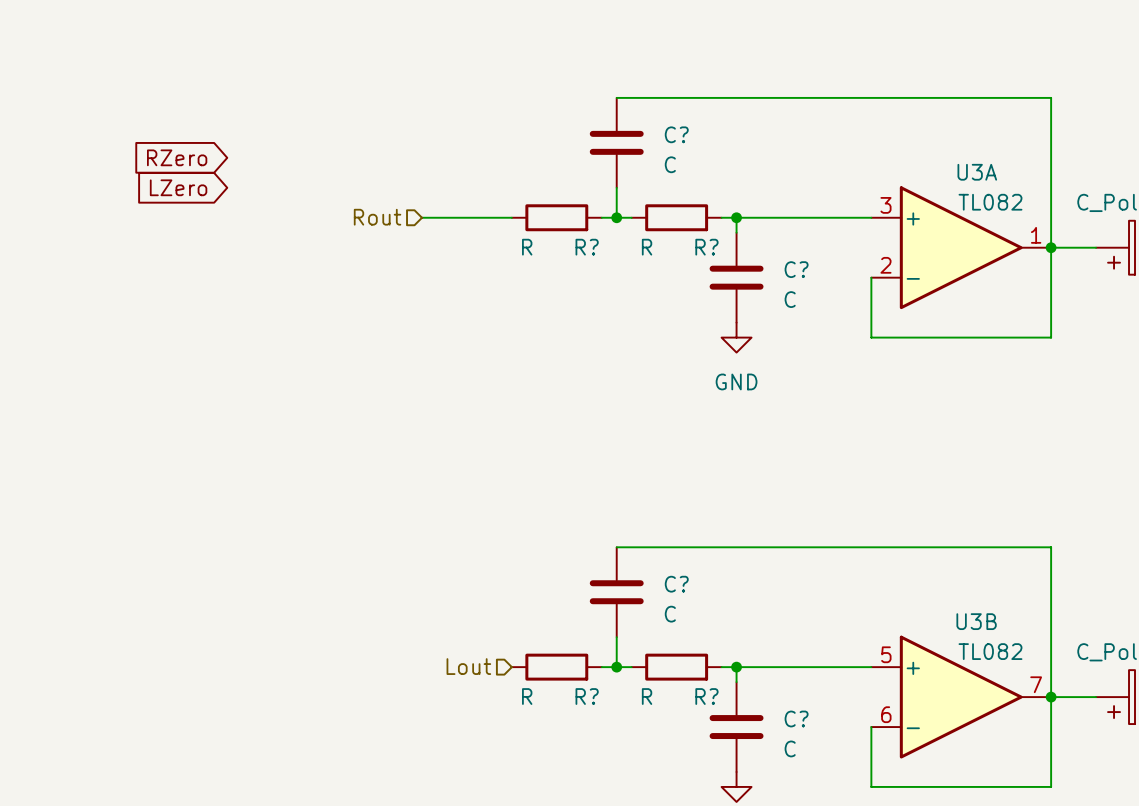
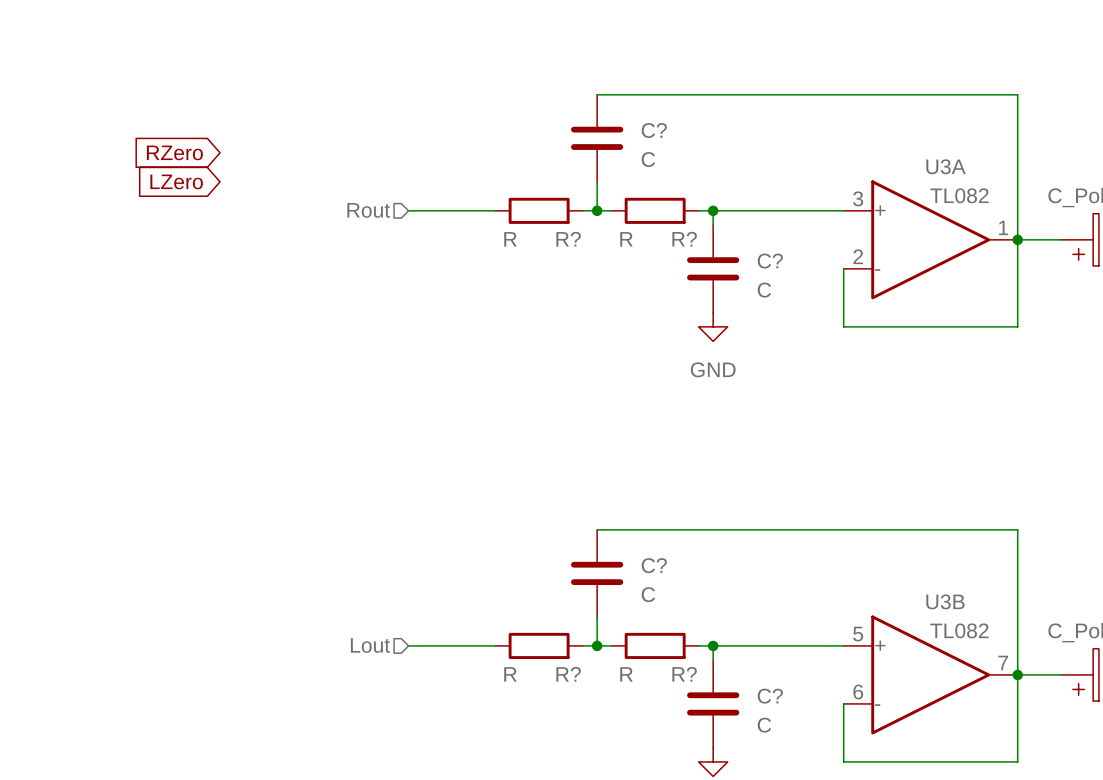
hierarchical label position: Lout (468, 666) -> Lout (370, 645)
wire: none -> (408, 645) (495, 645)

